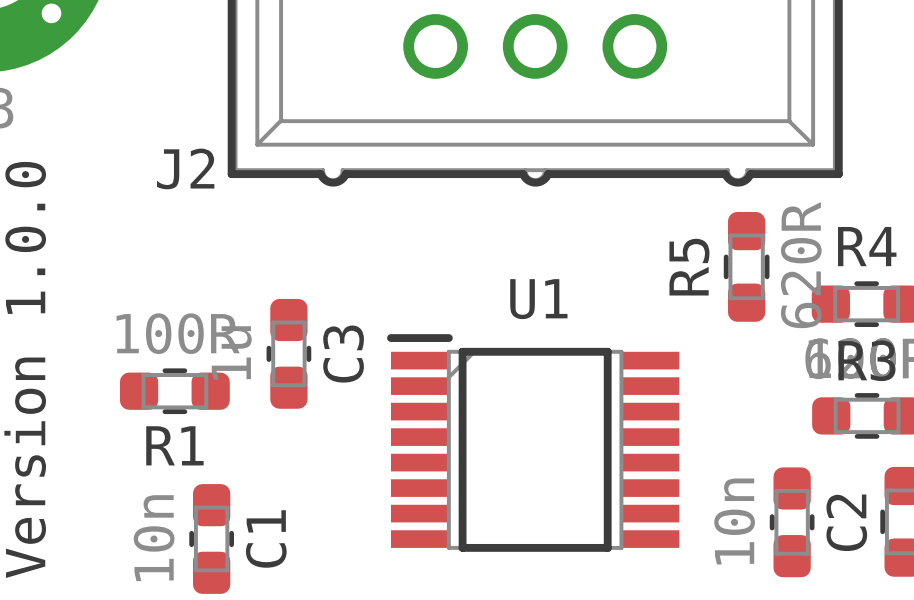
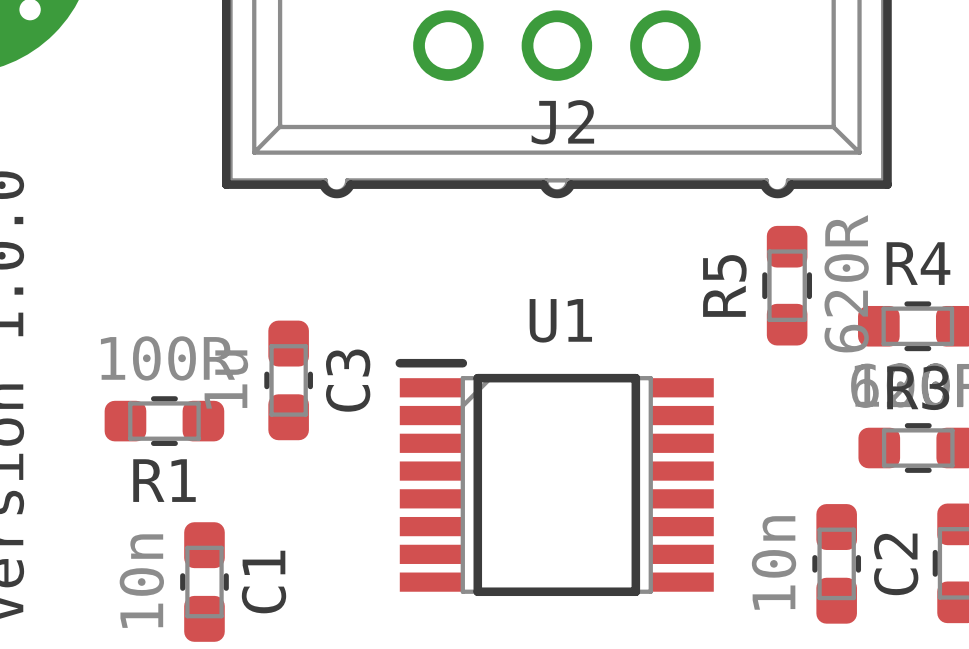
J2 name position: J2 (185, 168) -> J2 (562, 122)

